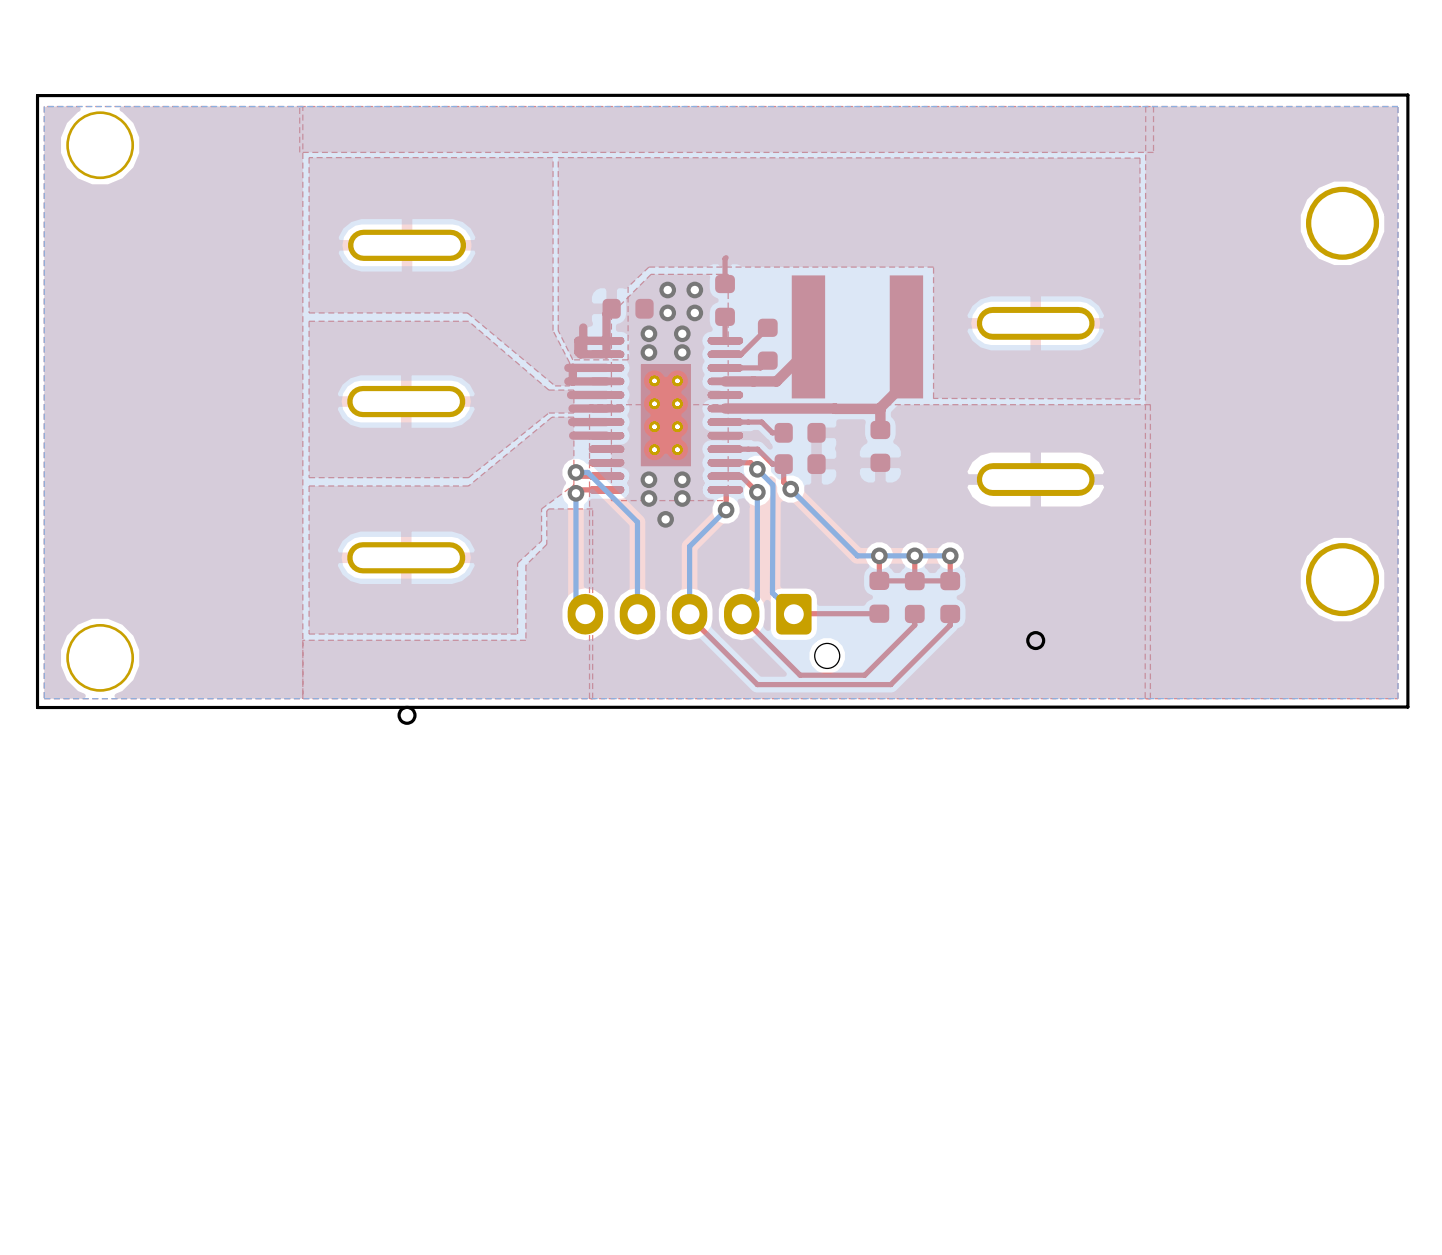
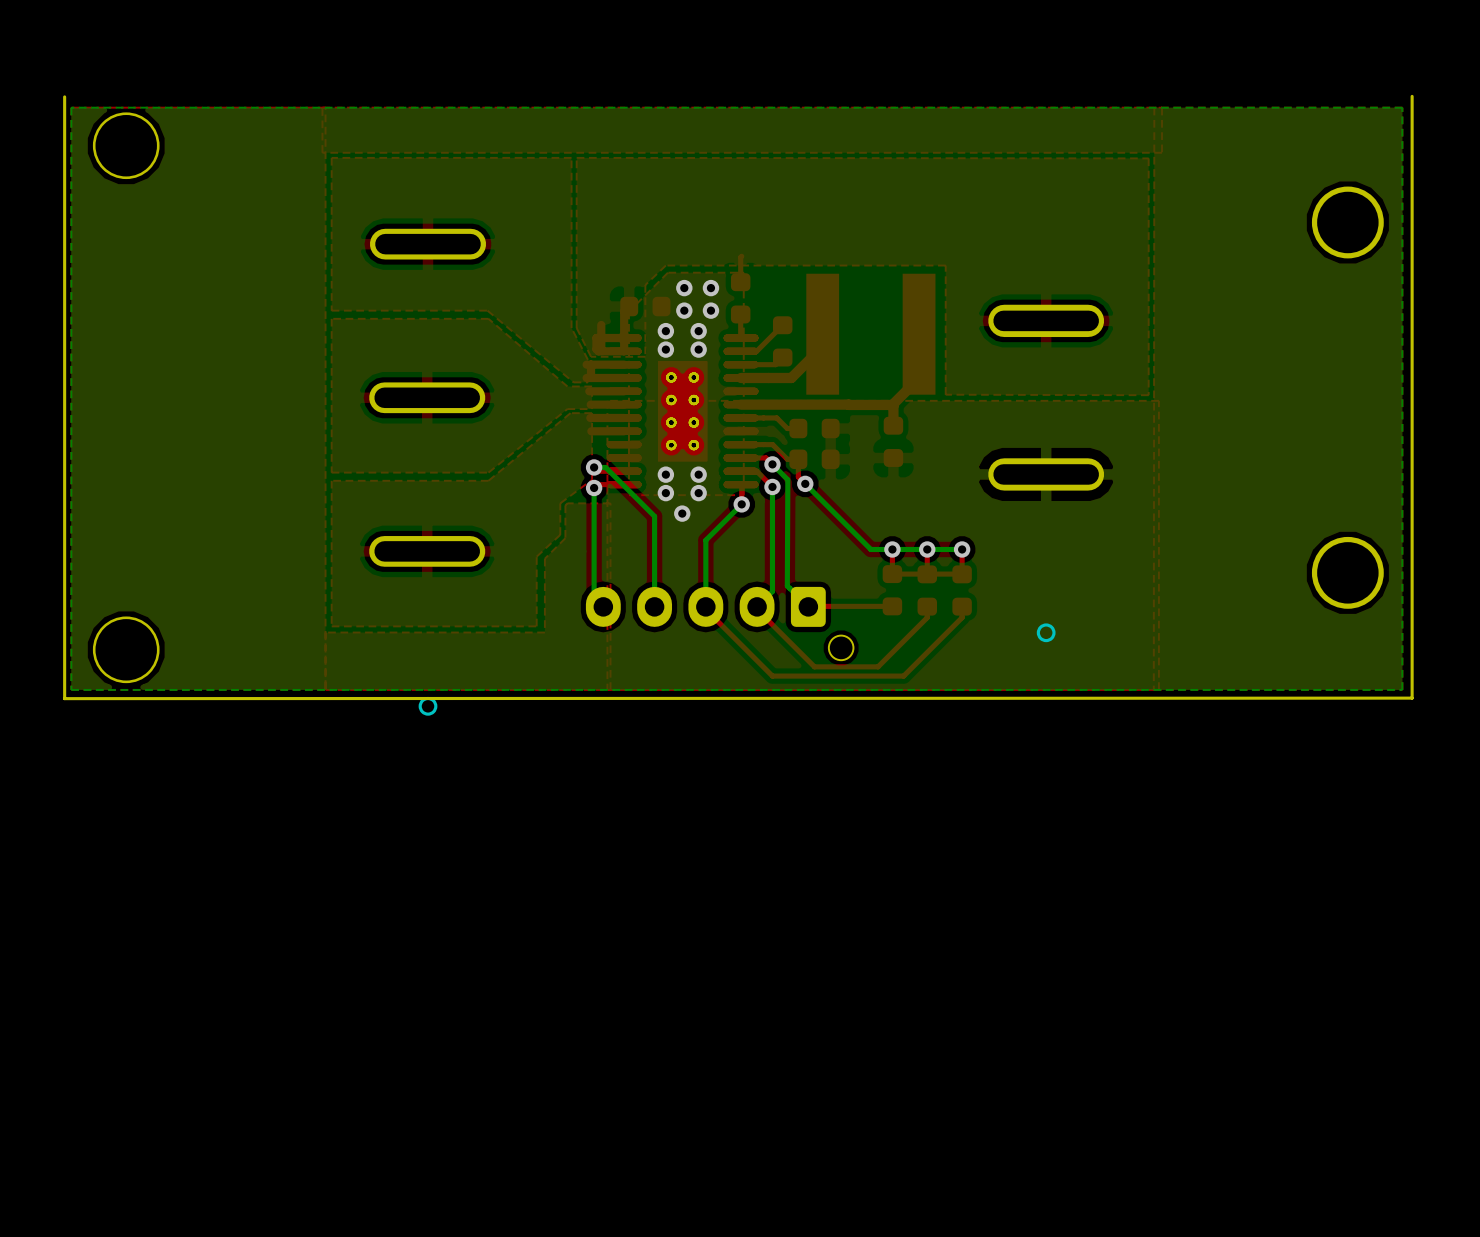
board edge: (1407, 95) (37, 95) -> none

